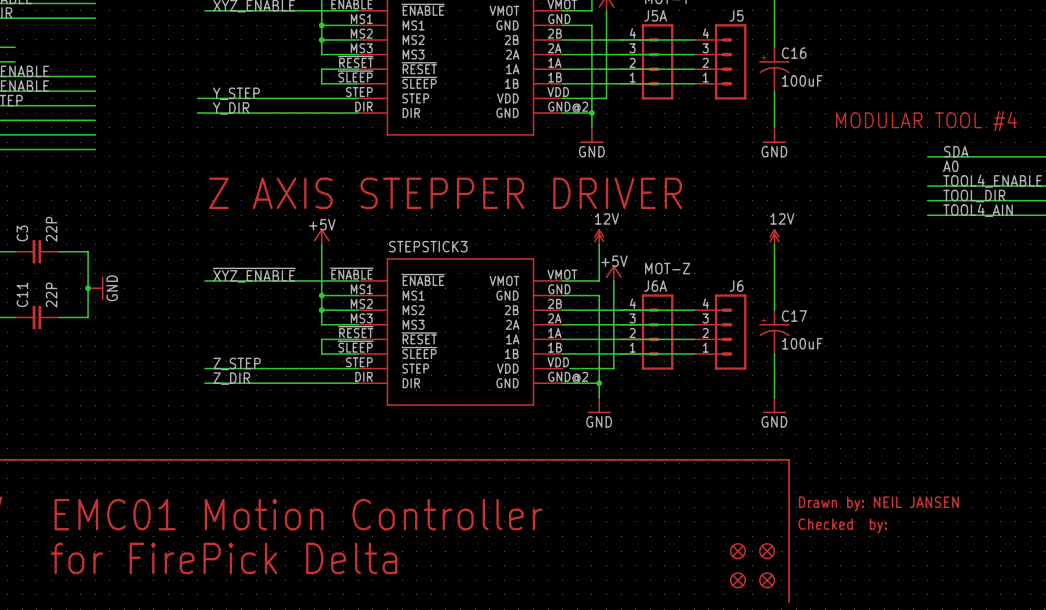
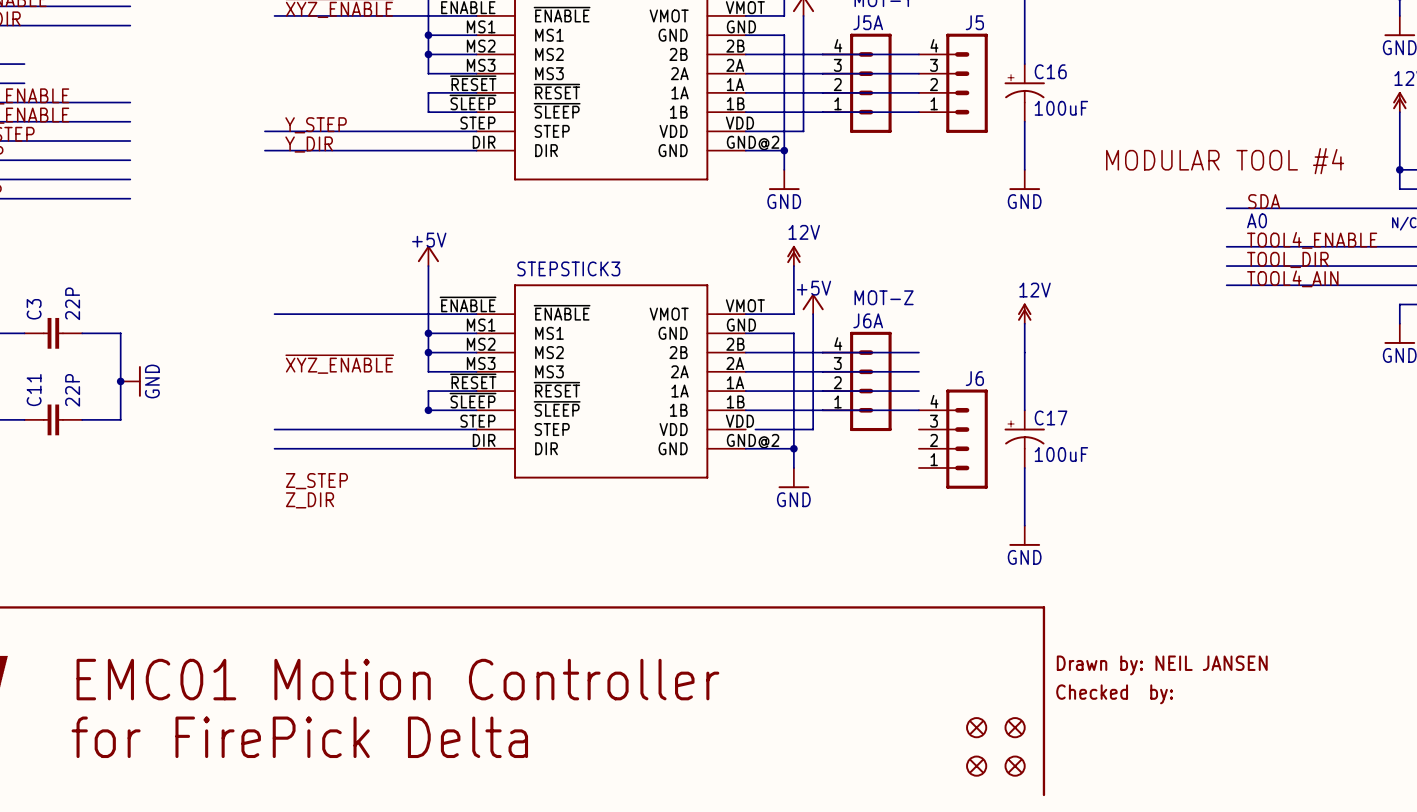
text: Z AXIS STEPPER DRIVER (445, 193) -> none
wire: none -> (428, 266) (428, 323)
wire: none -> (793, 266) (793, 314) (745, 314)
power symbol position: +5V (321, 236) -> +5V (428, 255)
power symbol position: 12V (599, 236) -> 12V (793, 255)
wire: (599, 244) (599, 251) -> (745, 333) (793, 333)
wire: none -> (428, 333) (476, 333)
junction: none -> (428, 333)
wire: none -> (428, 352) (476, 352)
junction: none -> (428, 352)
power symbol position: +5V (613, 273) -> +5V (813, 304)
wire: (204, 280) (321, 280) (321, 295) -> none
wire: none -> (918, 371) (793, 371) (793, 391) (918, 391)
junction: (321, 295) -> none
wire: (321, 310) (321, 324) -> (274, 429) (428, 429)
wire: (562, 324) (570, 324) -> none
wire: (694, 324) (613, 324) (613, 368) (570, 368) -> none
STEPSTICK3 position: (460, 332) -> (611, 381)
J6A position: (647, 332) -> (857, 381)
wire: (321, 339) (321, 353) (358, 353) -> (428, 448) (274, 448)
wire: (599, 339) (694, 339) -> none
junction: none -> (793, 448)
wire: (562, 353) (694, 353) -> (745, 352) (918, 352)
wire: (599, 353) (599, 397) -> (813, 314) (813, 371)
wire: (204, 368) (358, 368) -> (274, 314) (476, 314)
wire: (204, 383) (358, 383) -> none
wire: (562, 383) (599, 383) -> none
junction: (599, 383) -> none
power symbol position: GND (599, 405) -> GND (793, 478)

